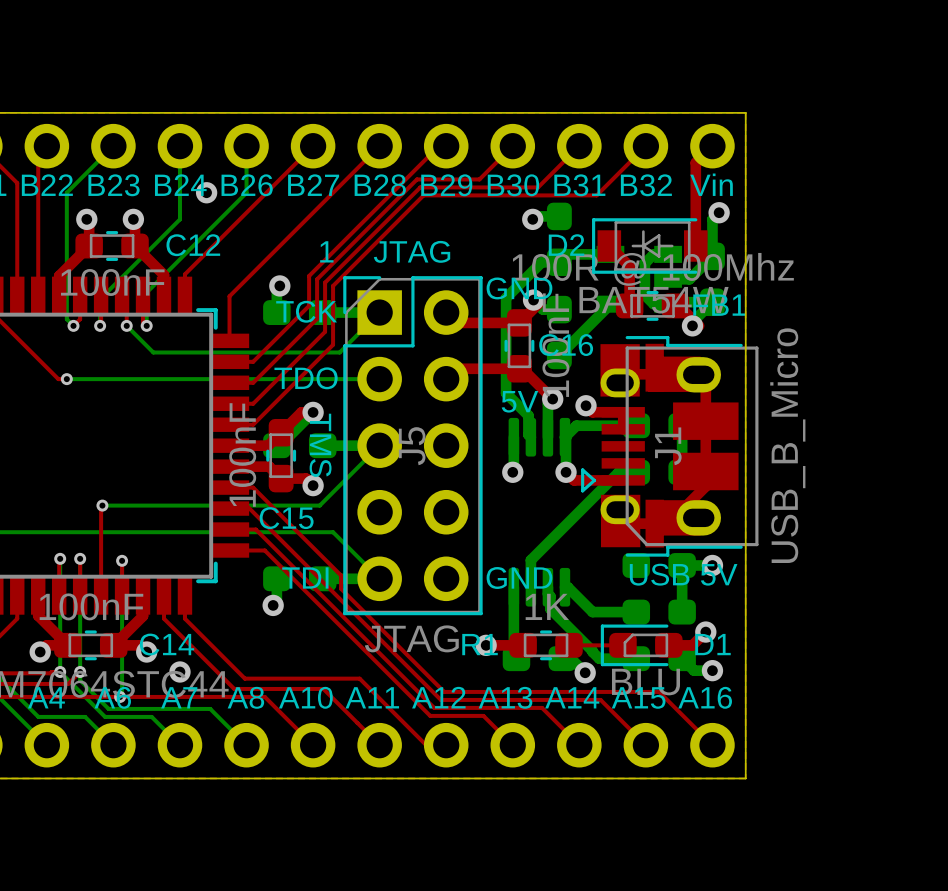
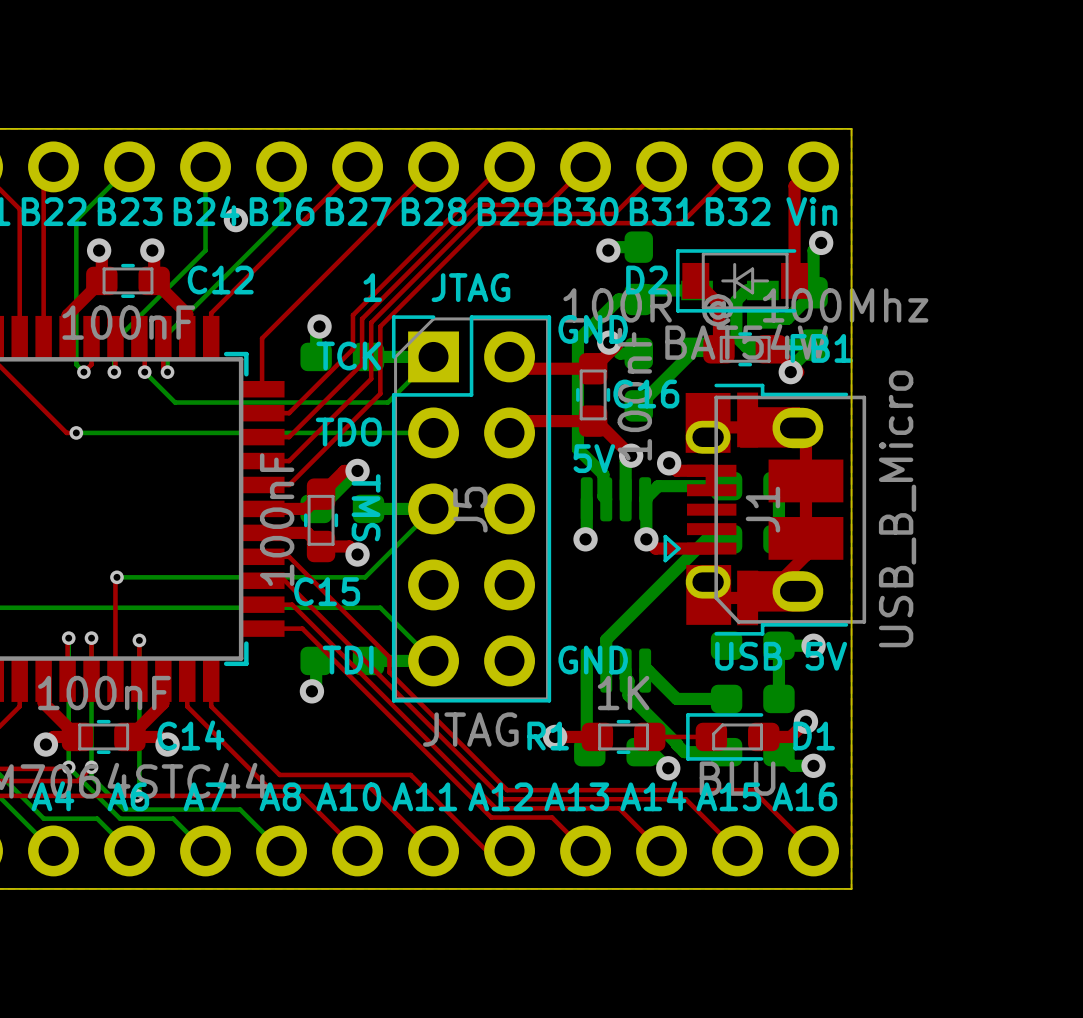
via: (179, 671) -> none

